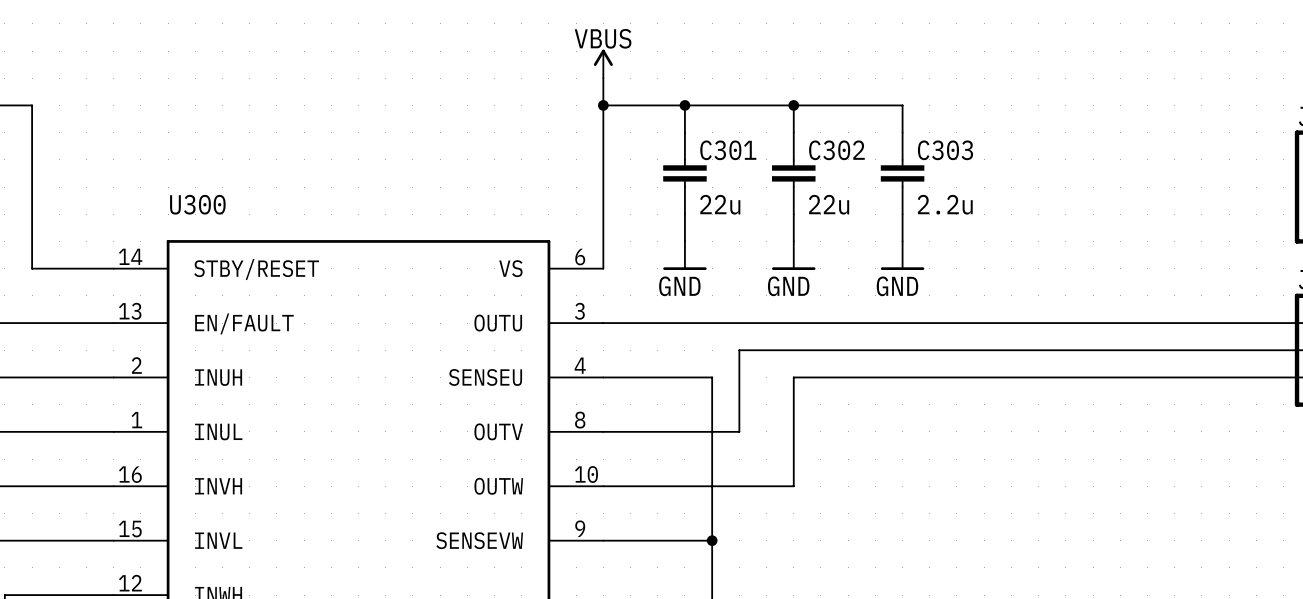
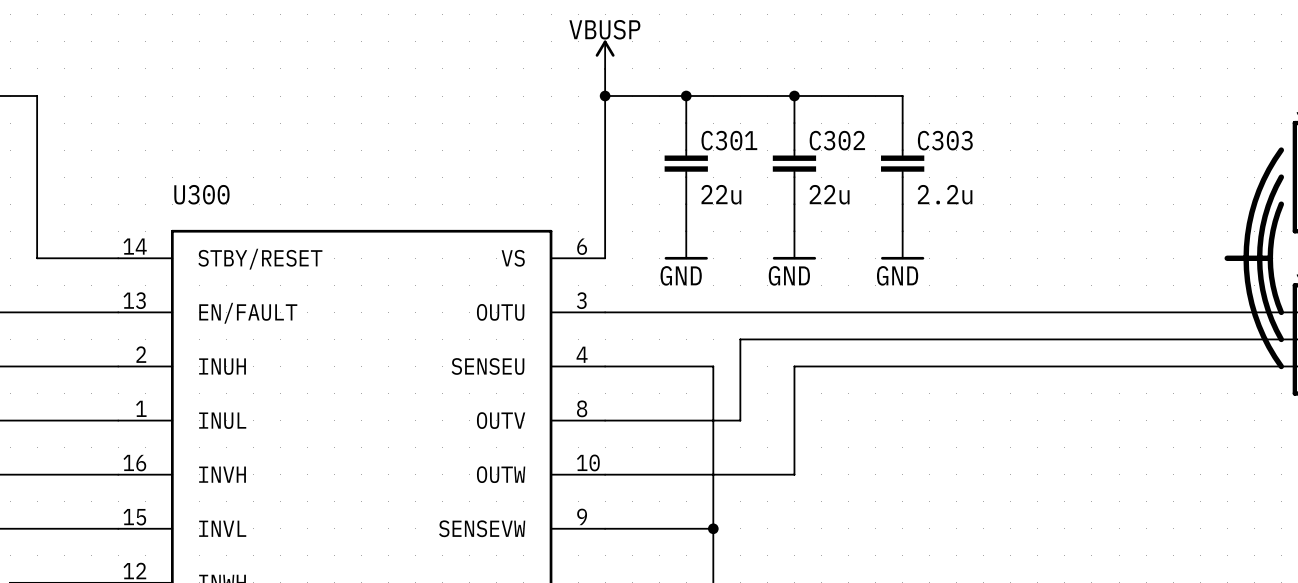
power symbol: VBUS (603, 63) -> VBUSP (605, 54)
line: none -> (1281, 150) (1263, 179) (1255, 201) (1247, 235) (1246, 258) (1247, 281) (1255, 315) (1263, 336) (1281, 366)
line: none -> (1281, 177) (1265, 216) (1259, 258) (1265, 300) (1281, 339)
line: none -> (1281, 204) (1273, 230) (1270, 258) (1273, 285) (1281, 312)
line: none -> (1227, 258) (1270, 258)

